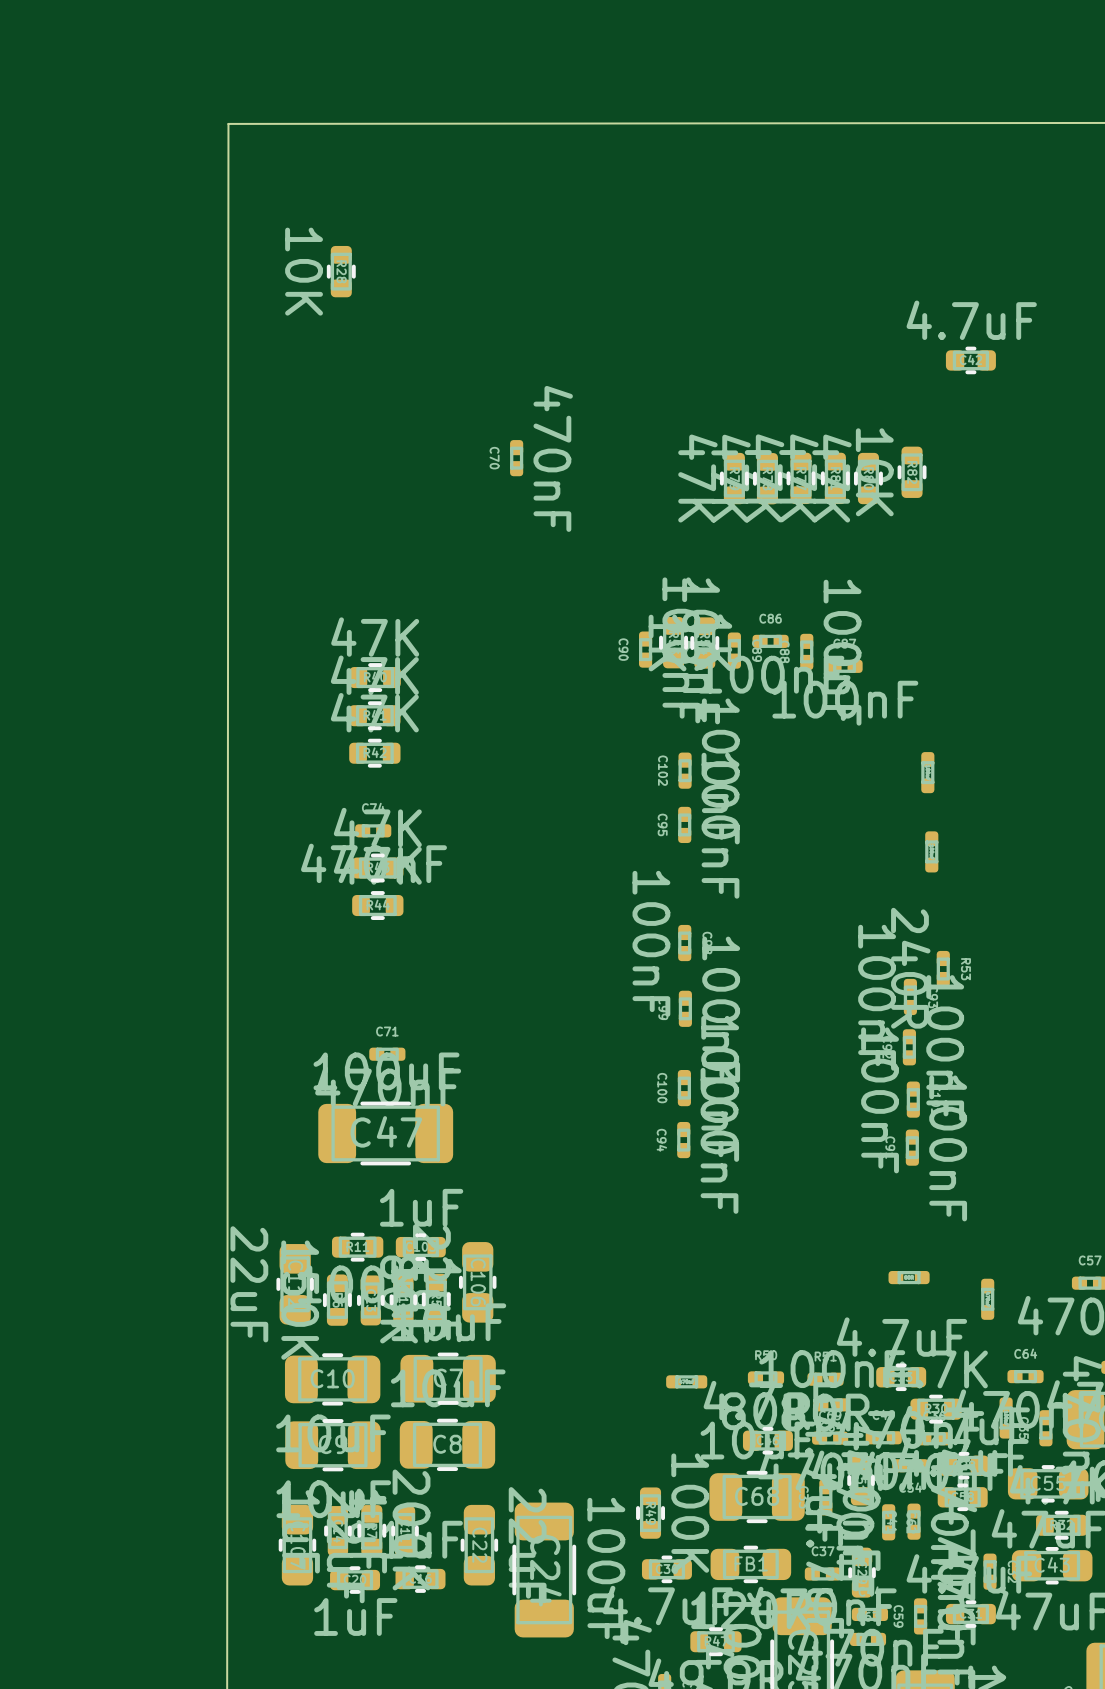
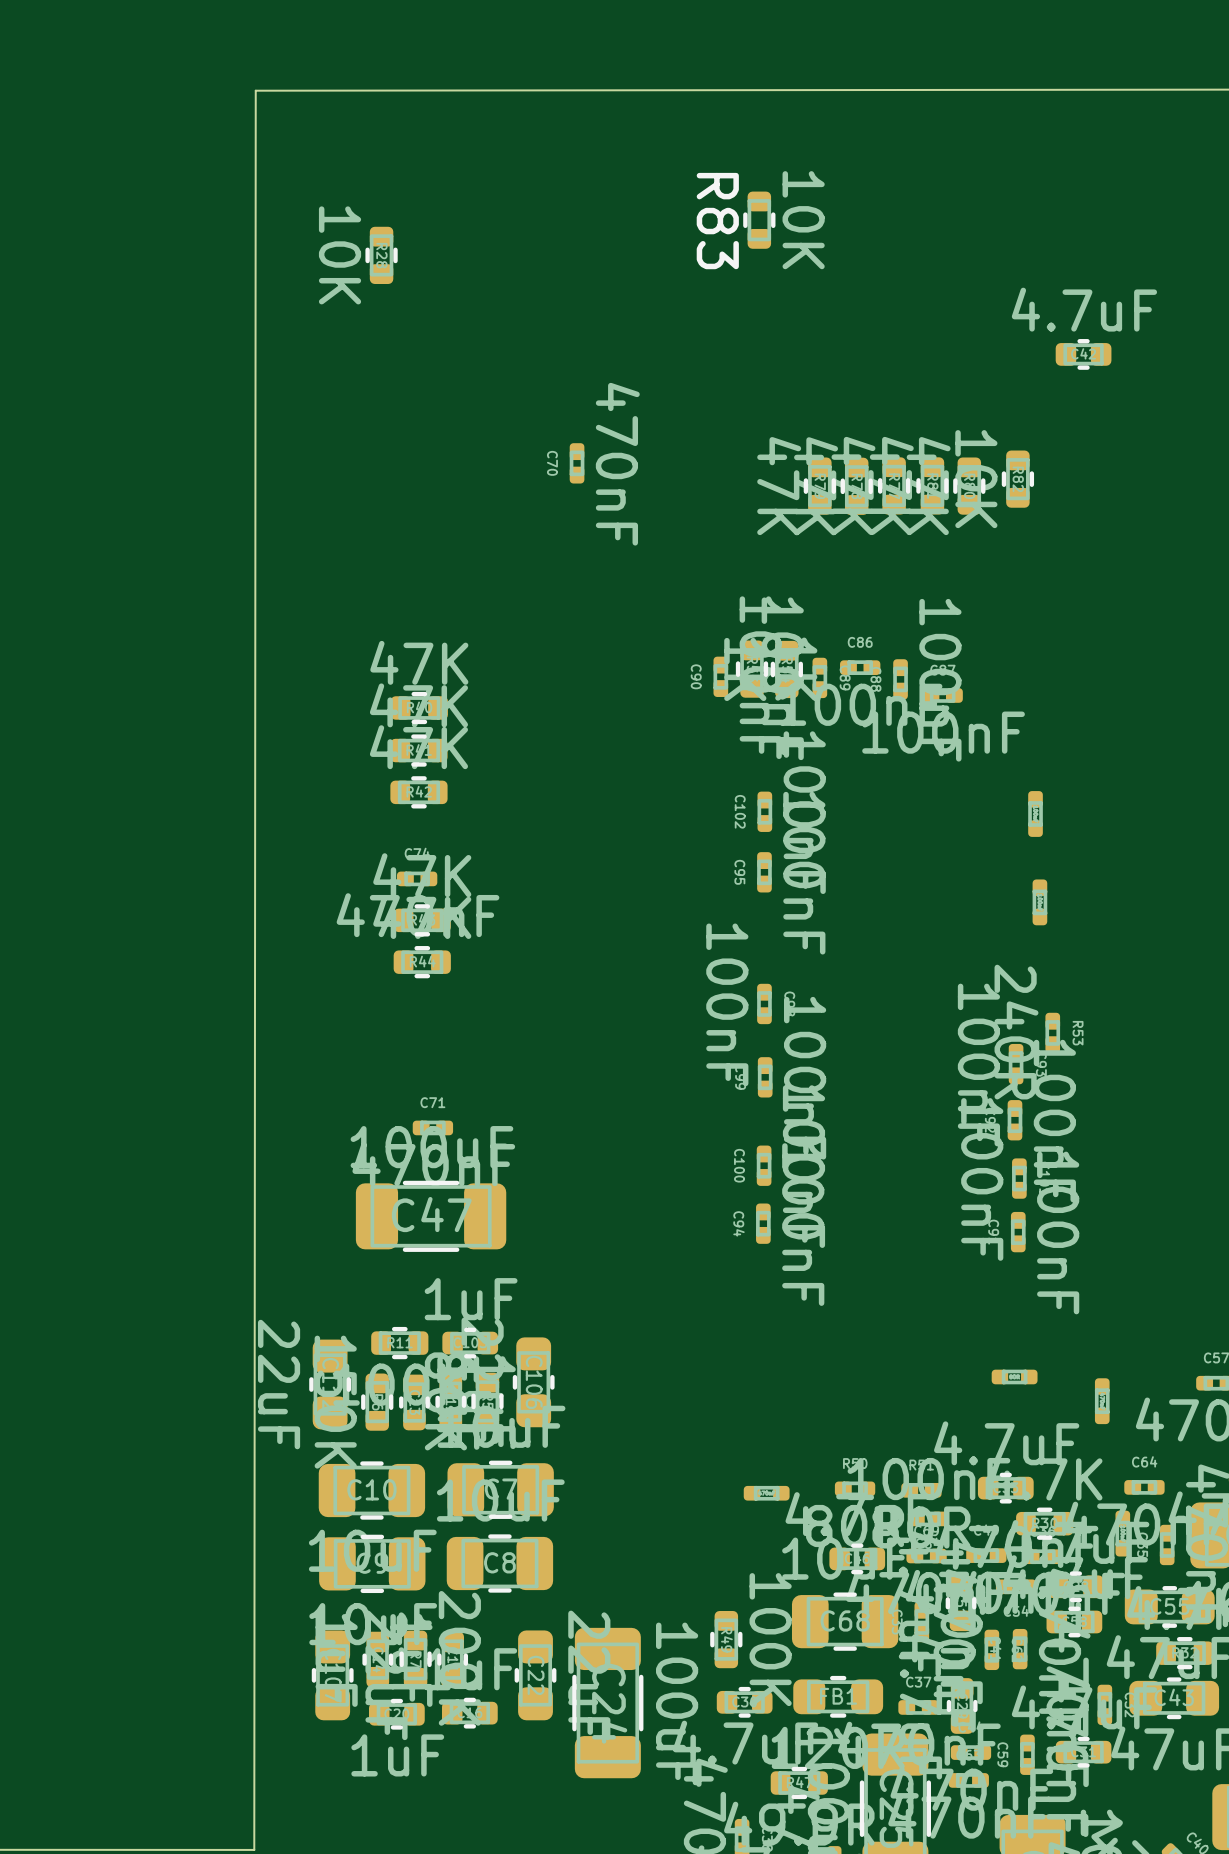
R83: none -> 10K (759, 220)

